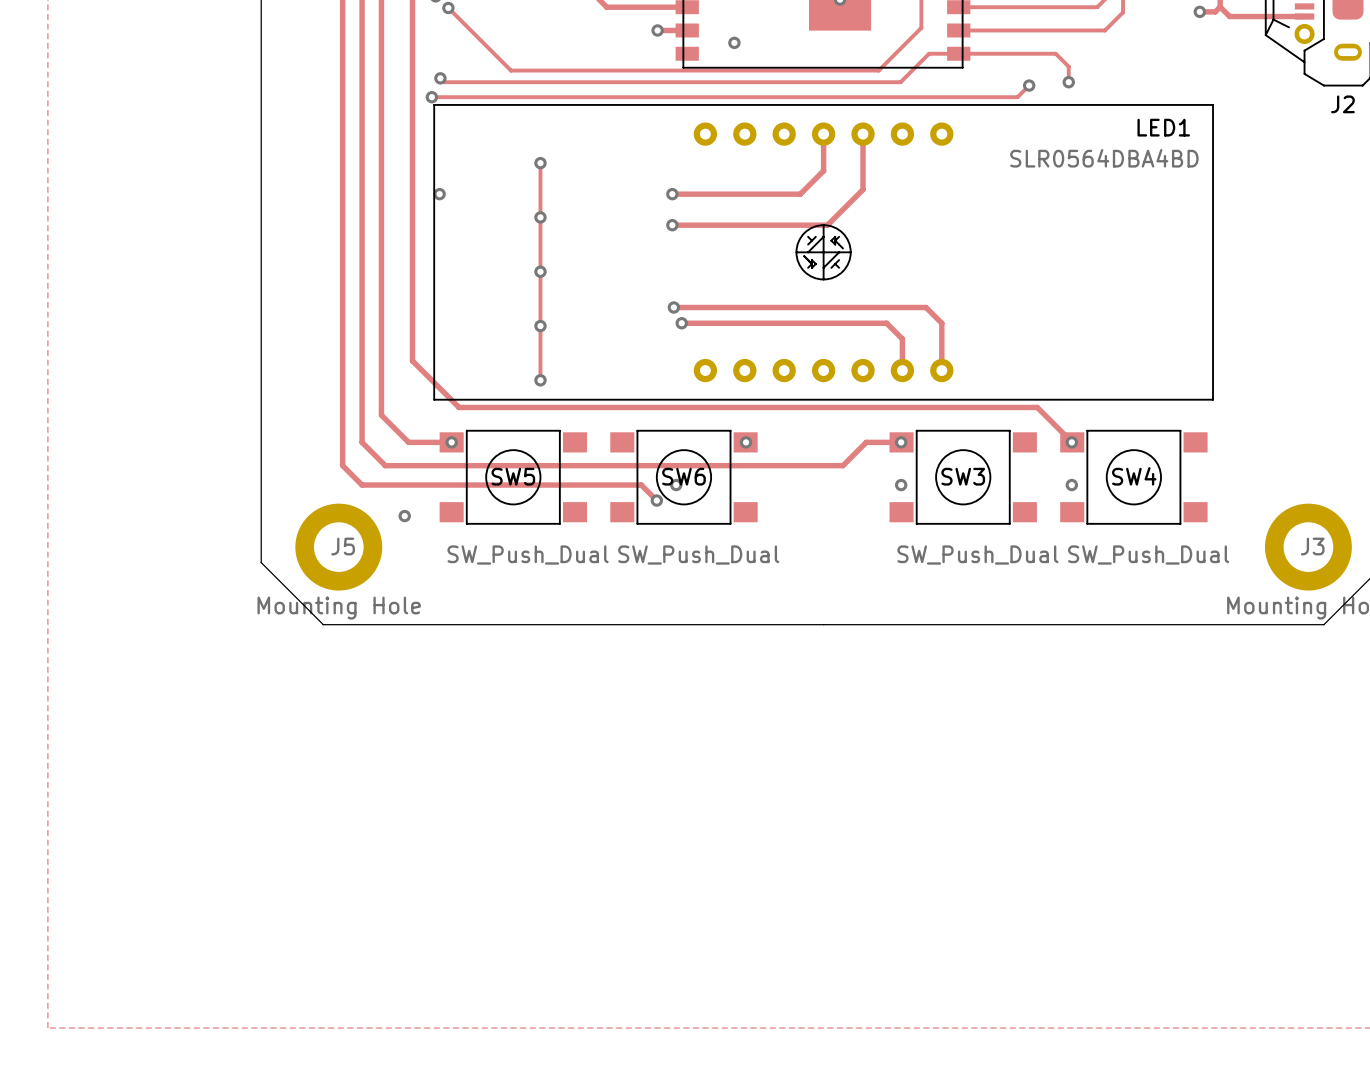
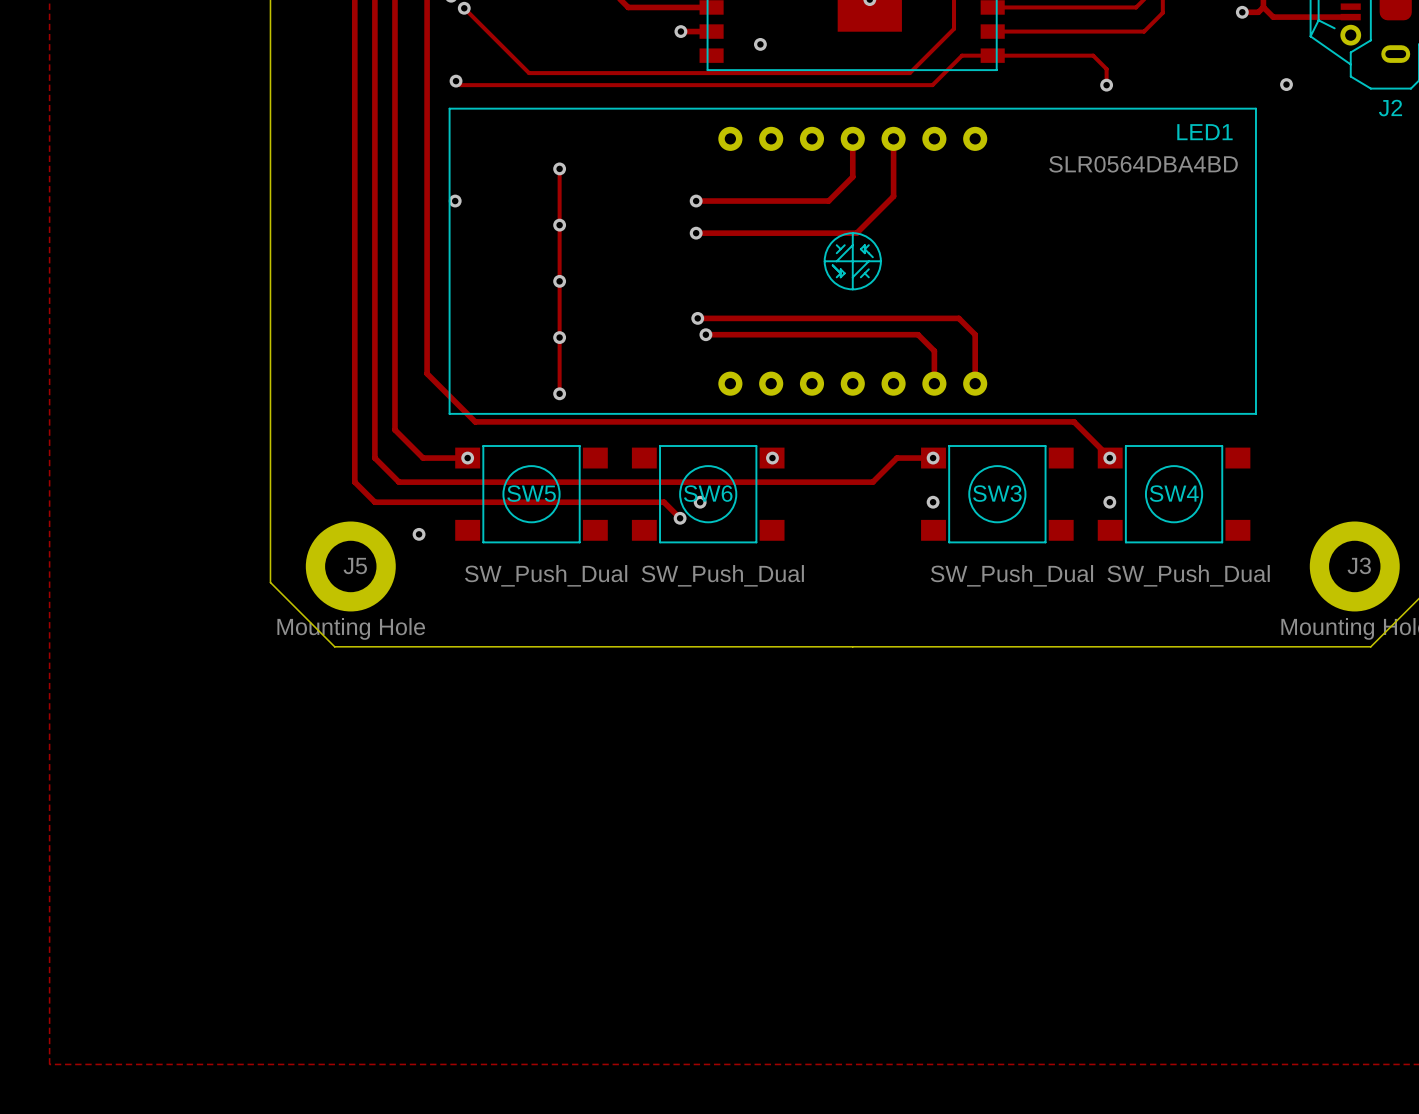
via: none -> (1286, 84)
track: (1029, 85) (1017, 97) (431, 97) -> none
via: (1029, 85) -> none
via: (431, 97) -> none

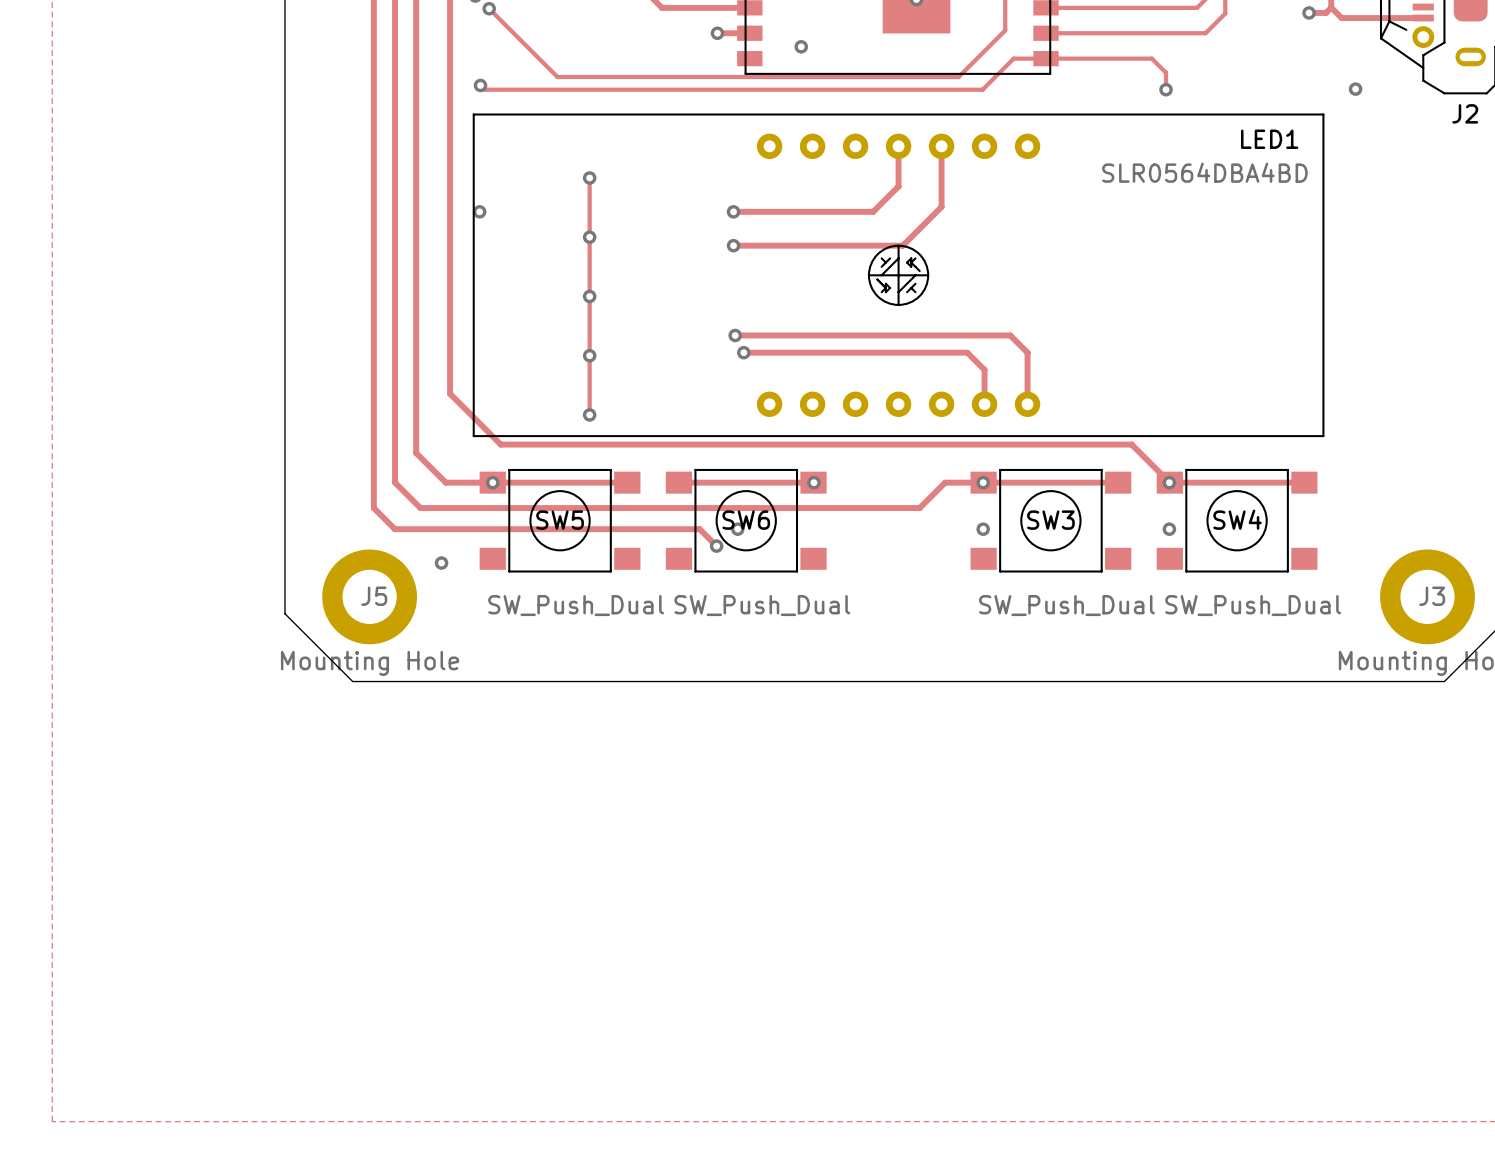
track: none -> (492, 482) (627, 482)
track: none -> (678, 482) (813, 482)
track: none -> (983, 482) (1118, 482)
track: none -> (1169, 482) (1304, 482)

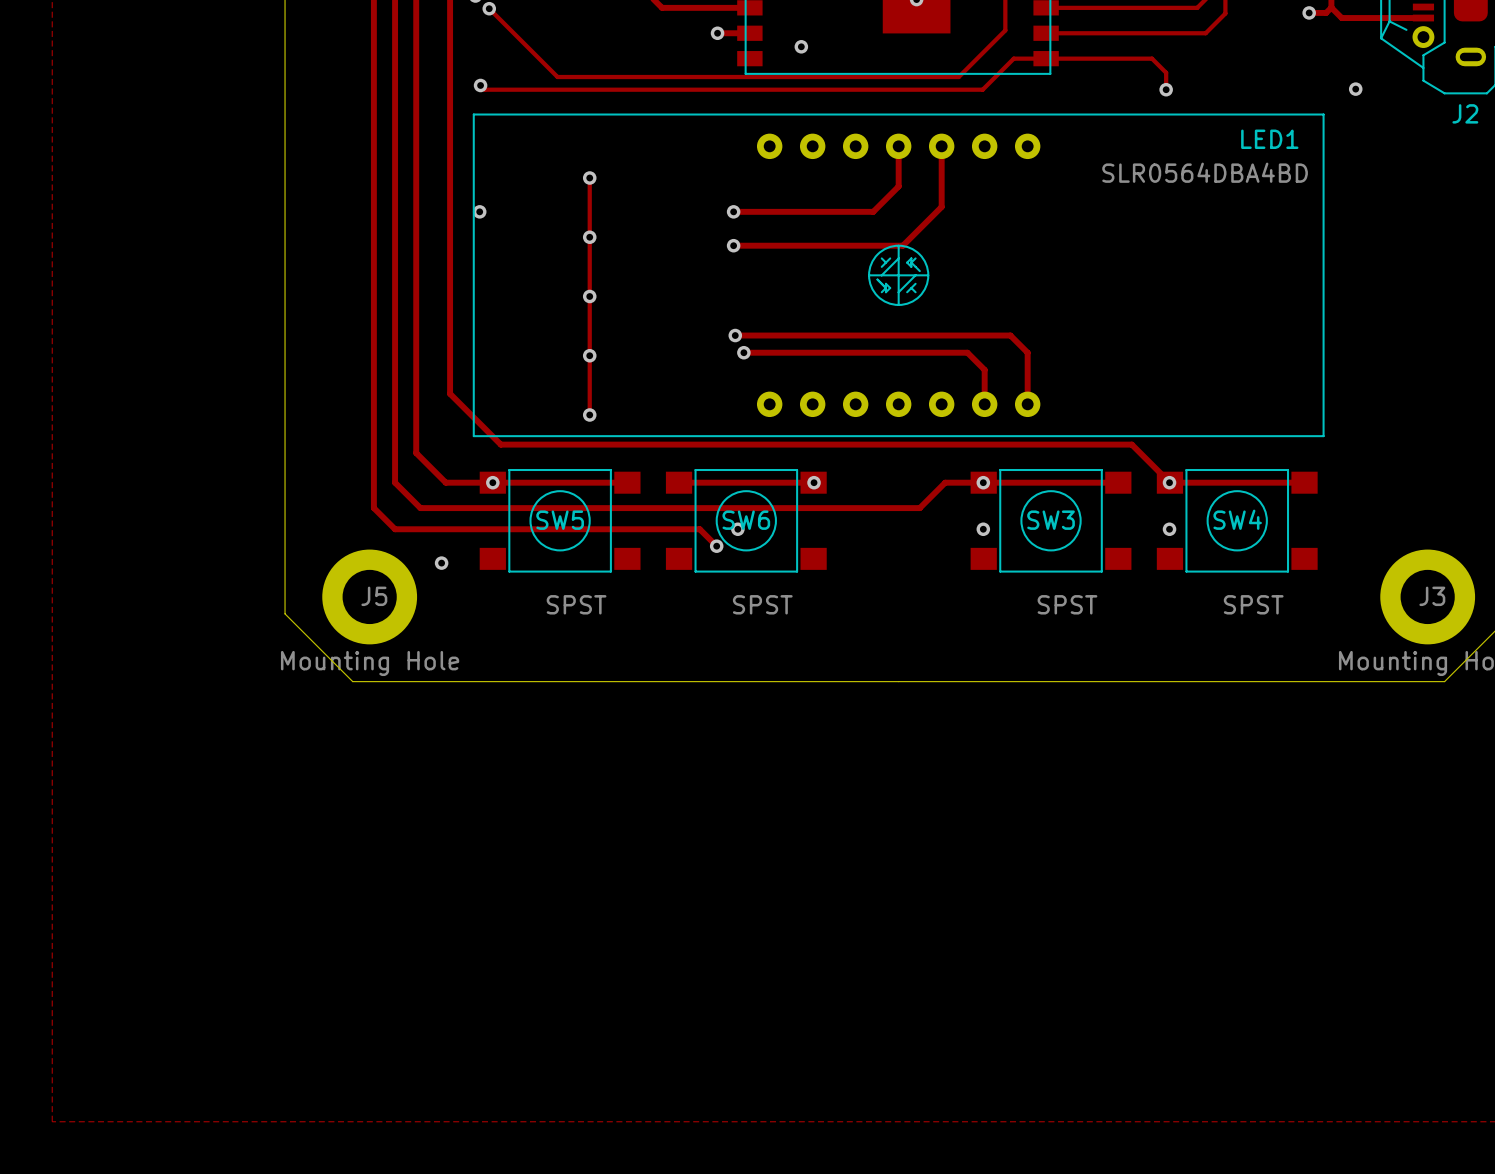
SW5 value: SW_Push_Dual (576, 605) -> SPST (576, 604)
SW6 value: SW_Push_Dual (762, 605) -> SPST (762, 604)
SW3 value: SW_Push_Dual (1066, 605) -> SPST (1067, 604)
SW4 value: SW_Push_Dual (1253, 605) -> SPST (1253, 604)

